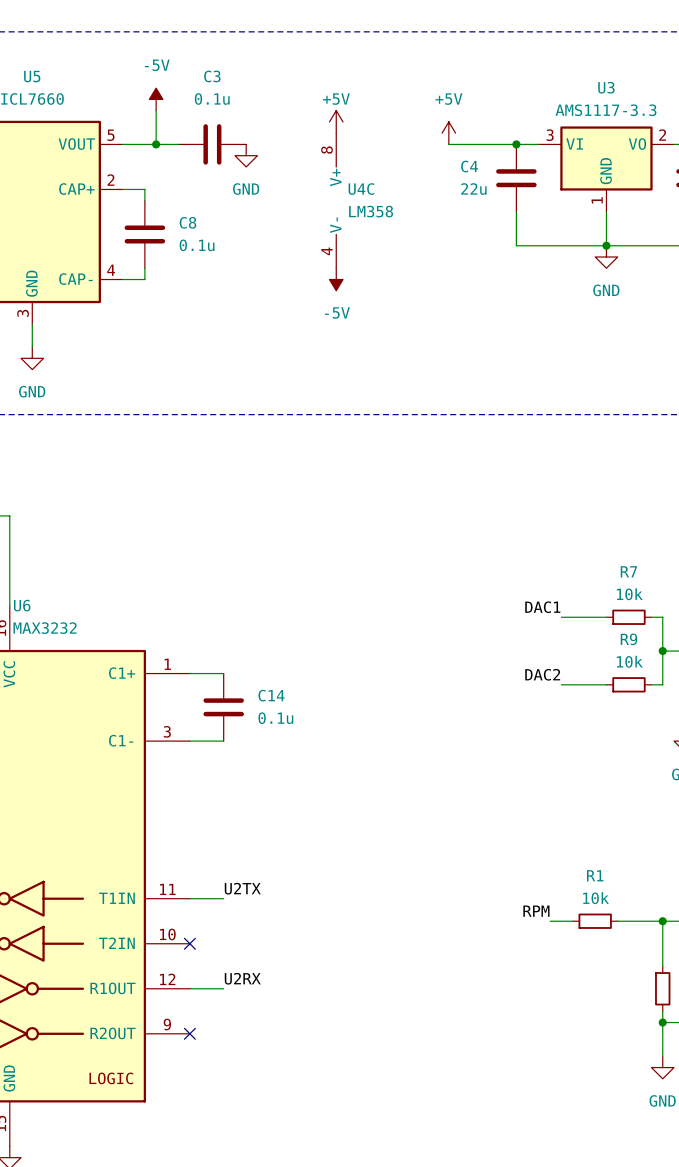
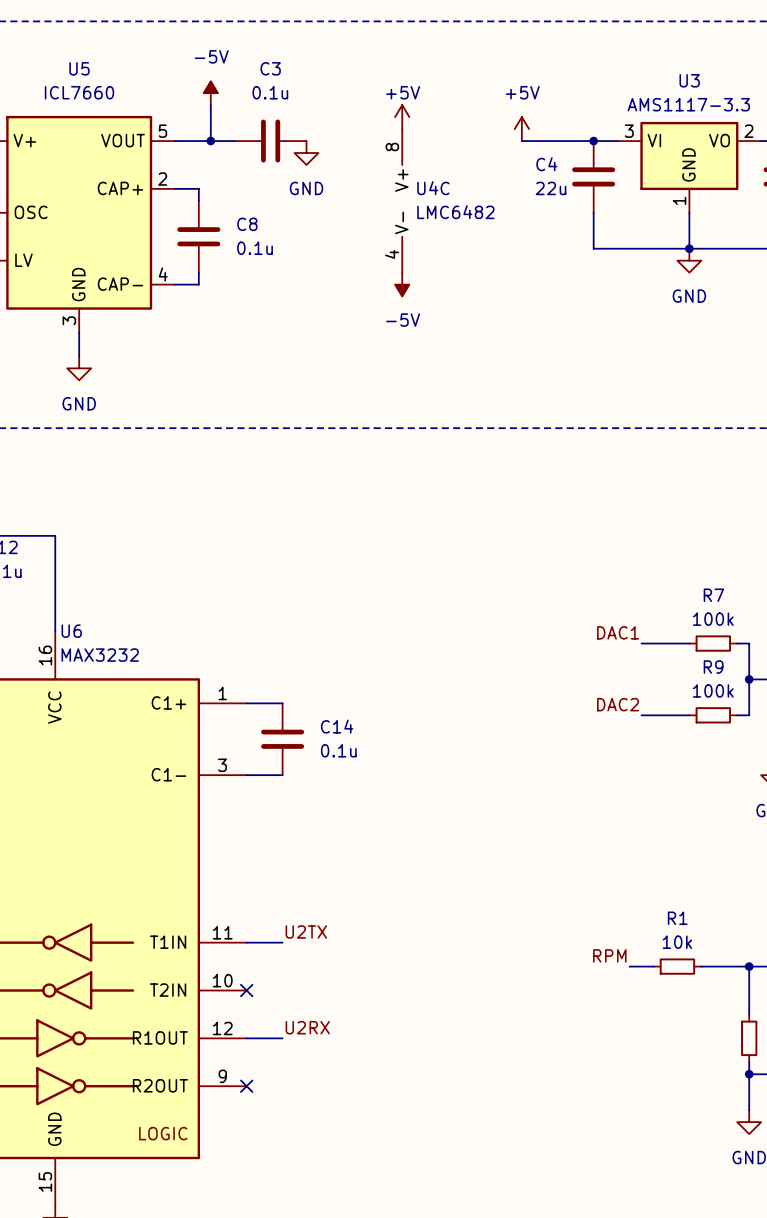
U4C value: LM358 (371, 211) -> LMC6482 (455, 212)
R7 value: 10k (629, 594) -> 100k (713, 619)
R9 value: 10k (629, 661) -> 100k (713, 690)

